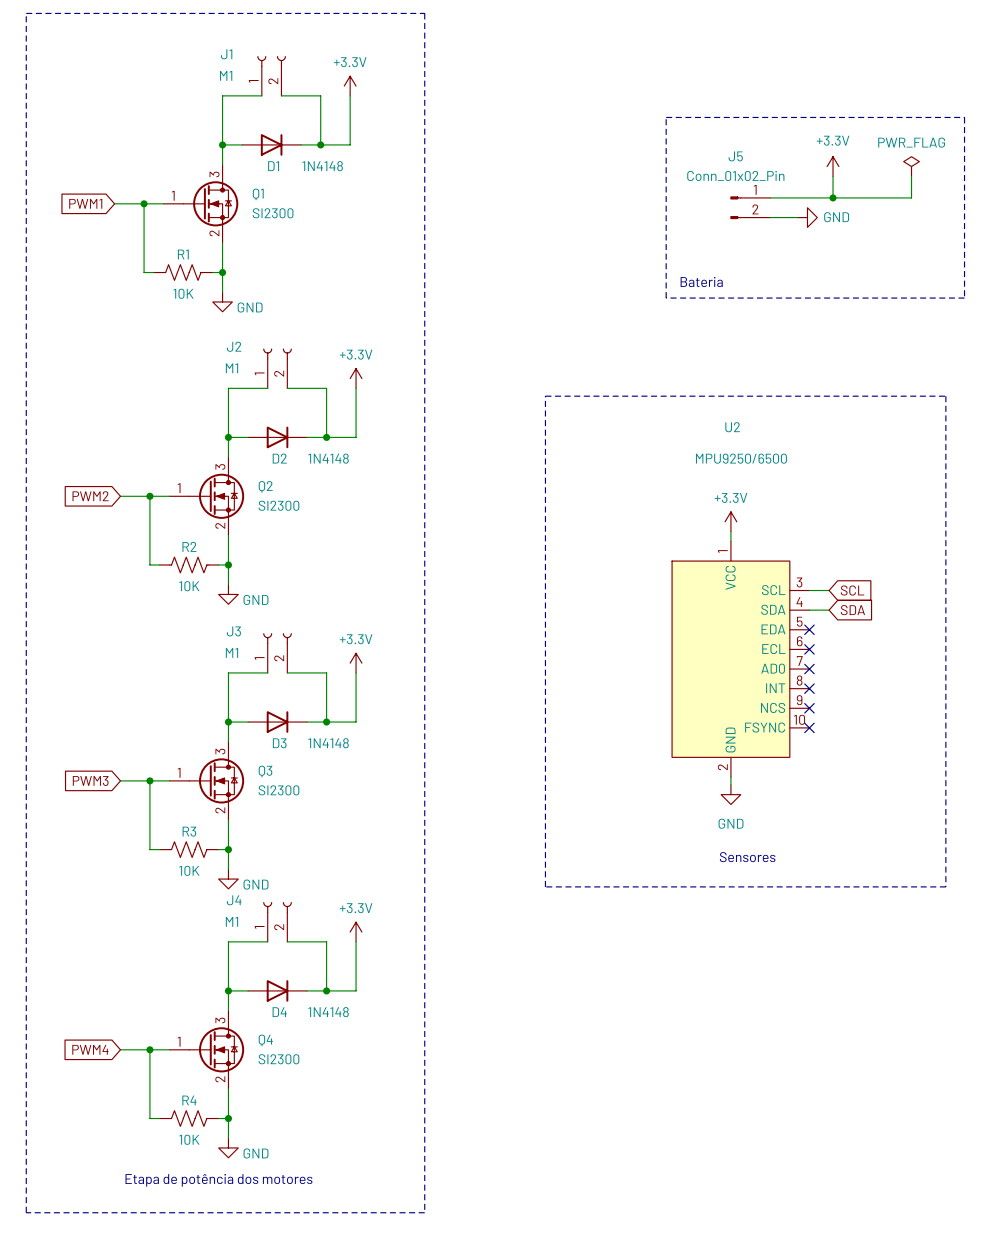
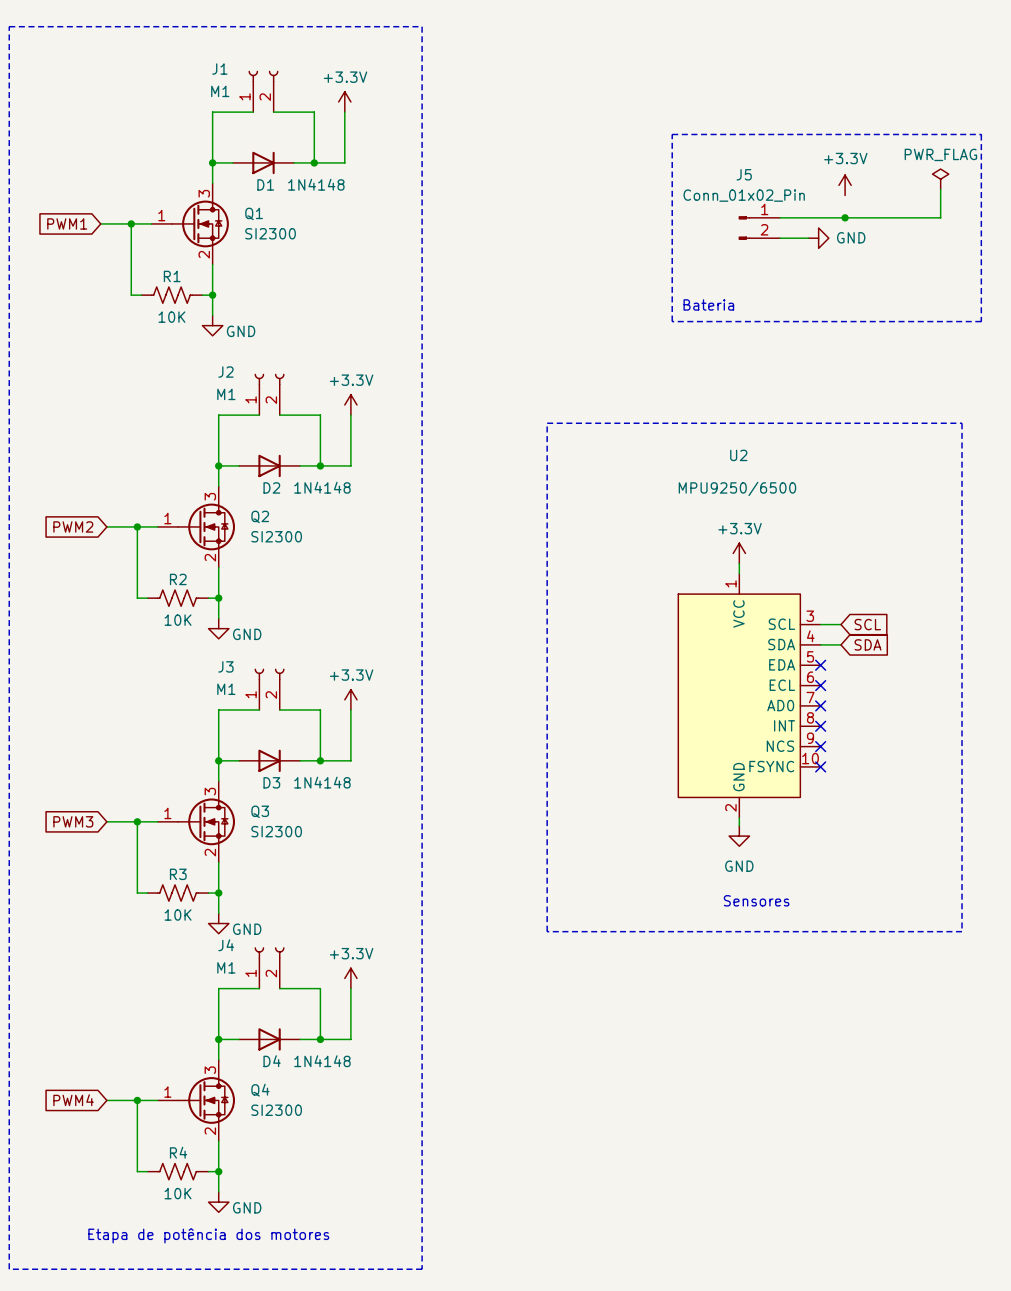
power symbol position: PWR_FLAG (911, 166) -> PWR_FLAG (940, 179)
wire: (833, 176) (833, 197) -> none
wire: (911, 176) (911, 197) -> (940, 189) (940, 217) (926, 217)

